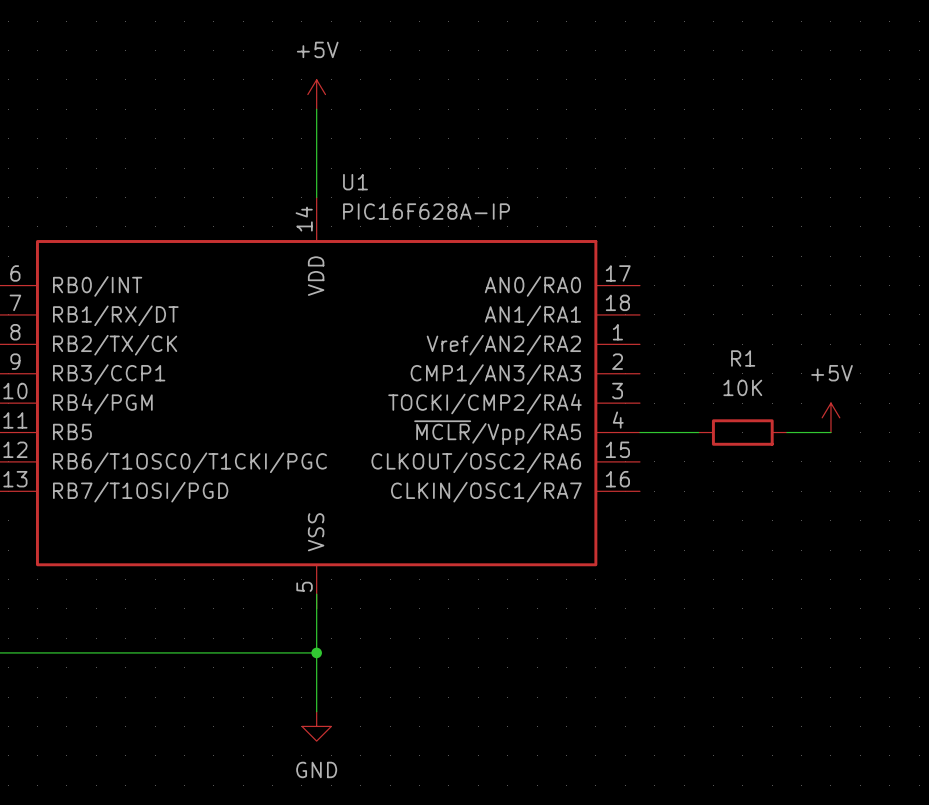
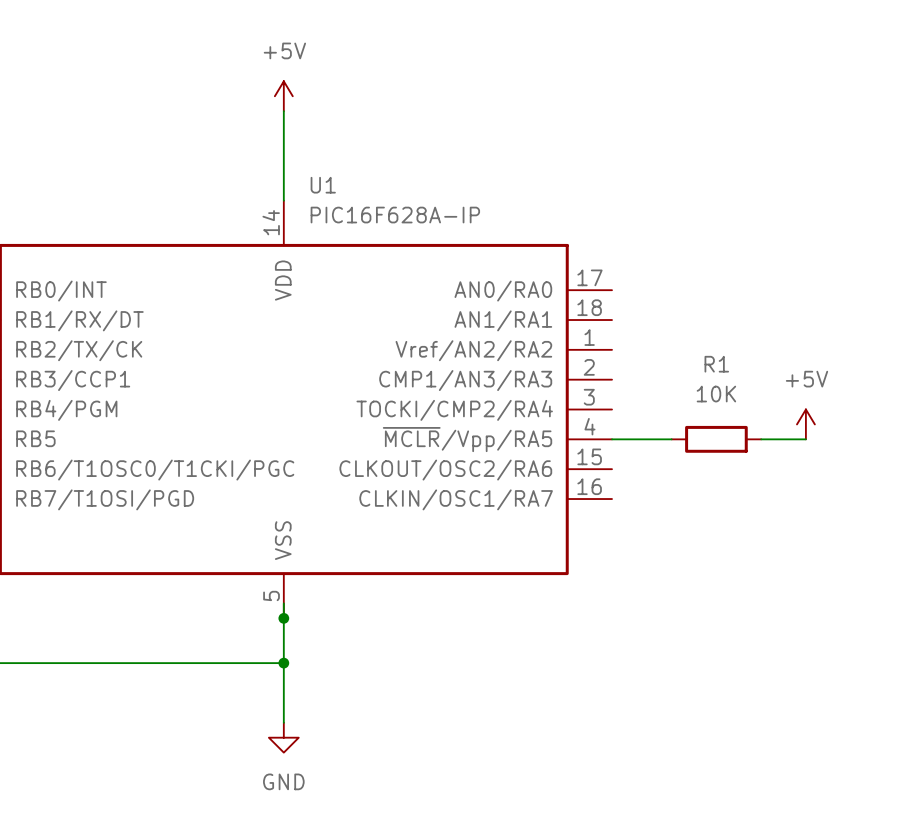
junction: none -> (283, 618)

